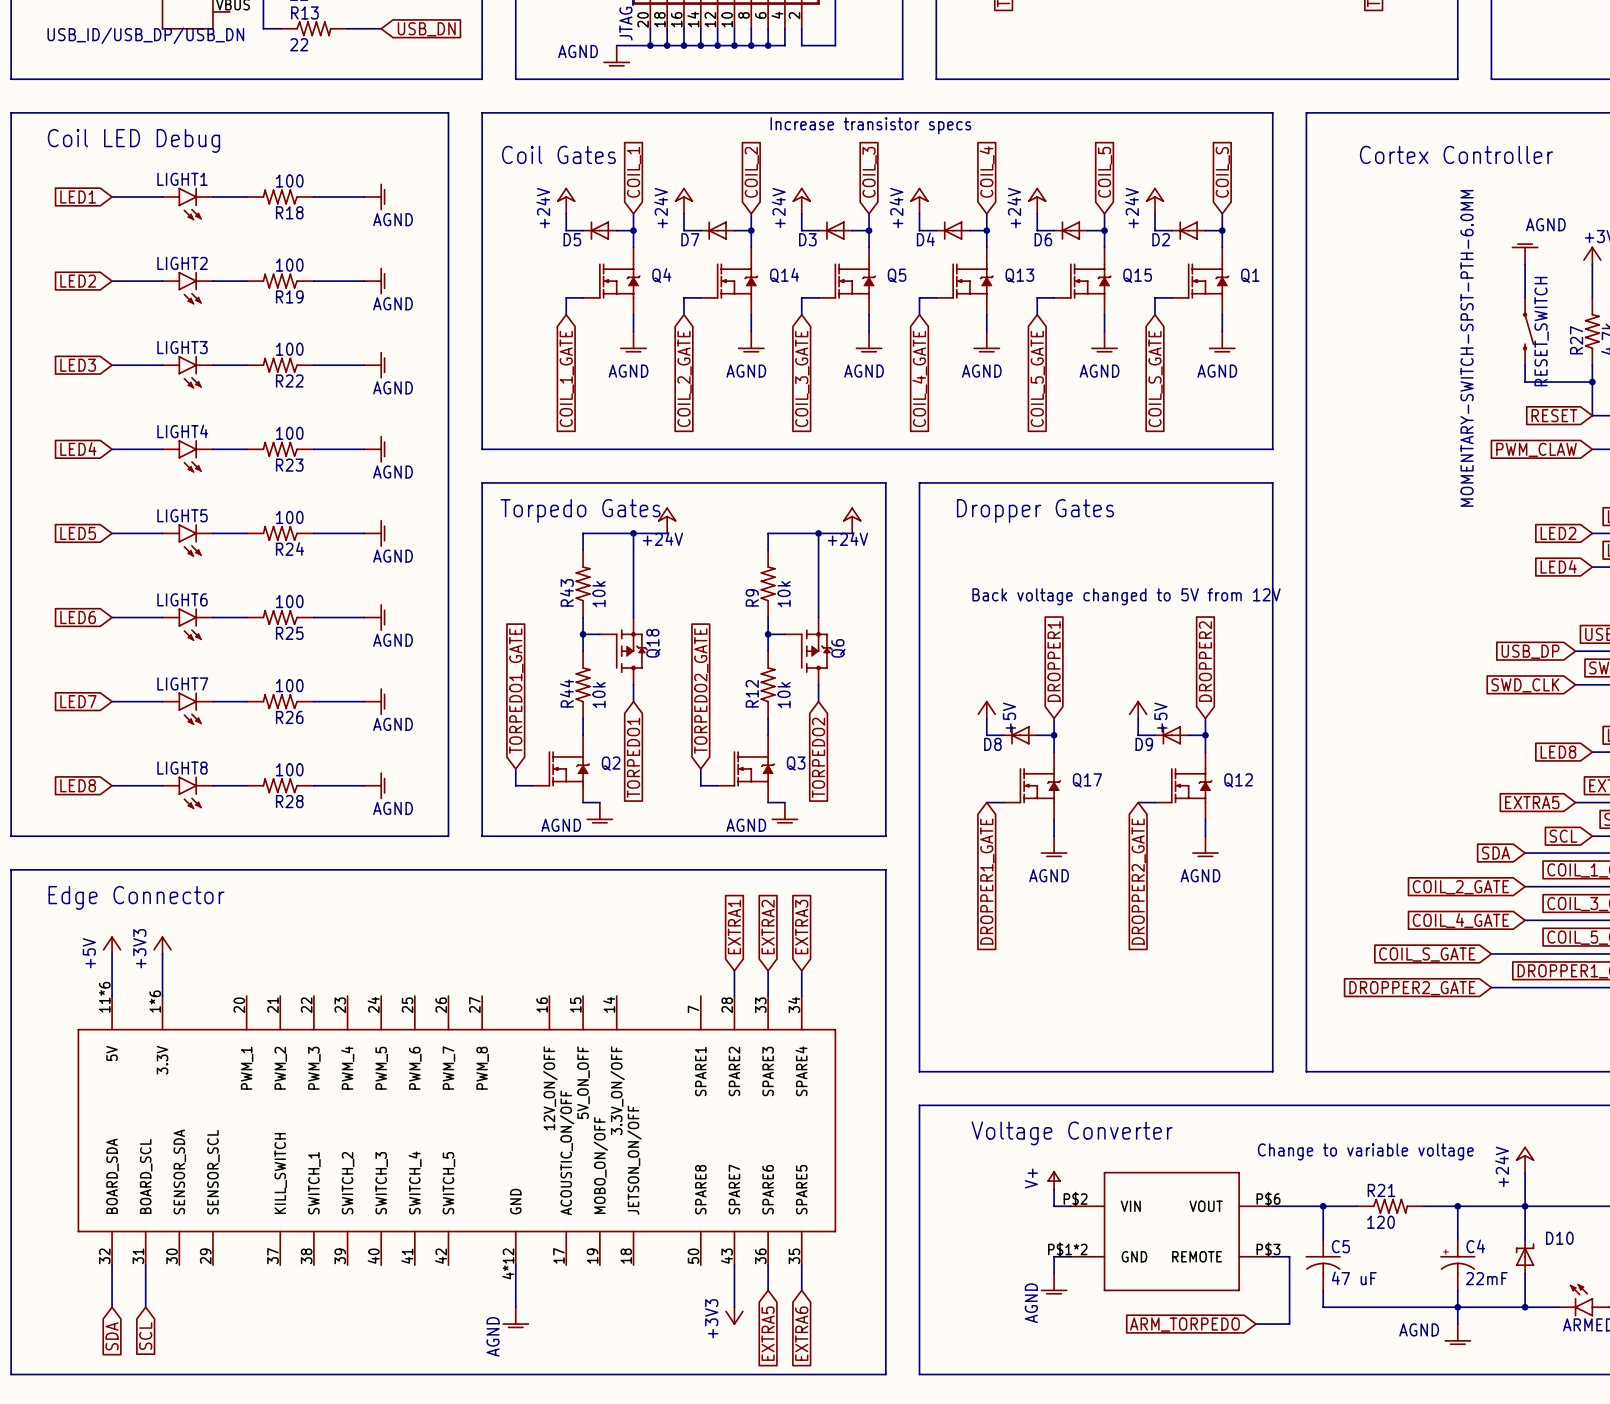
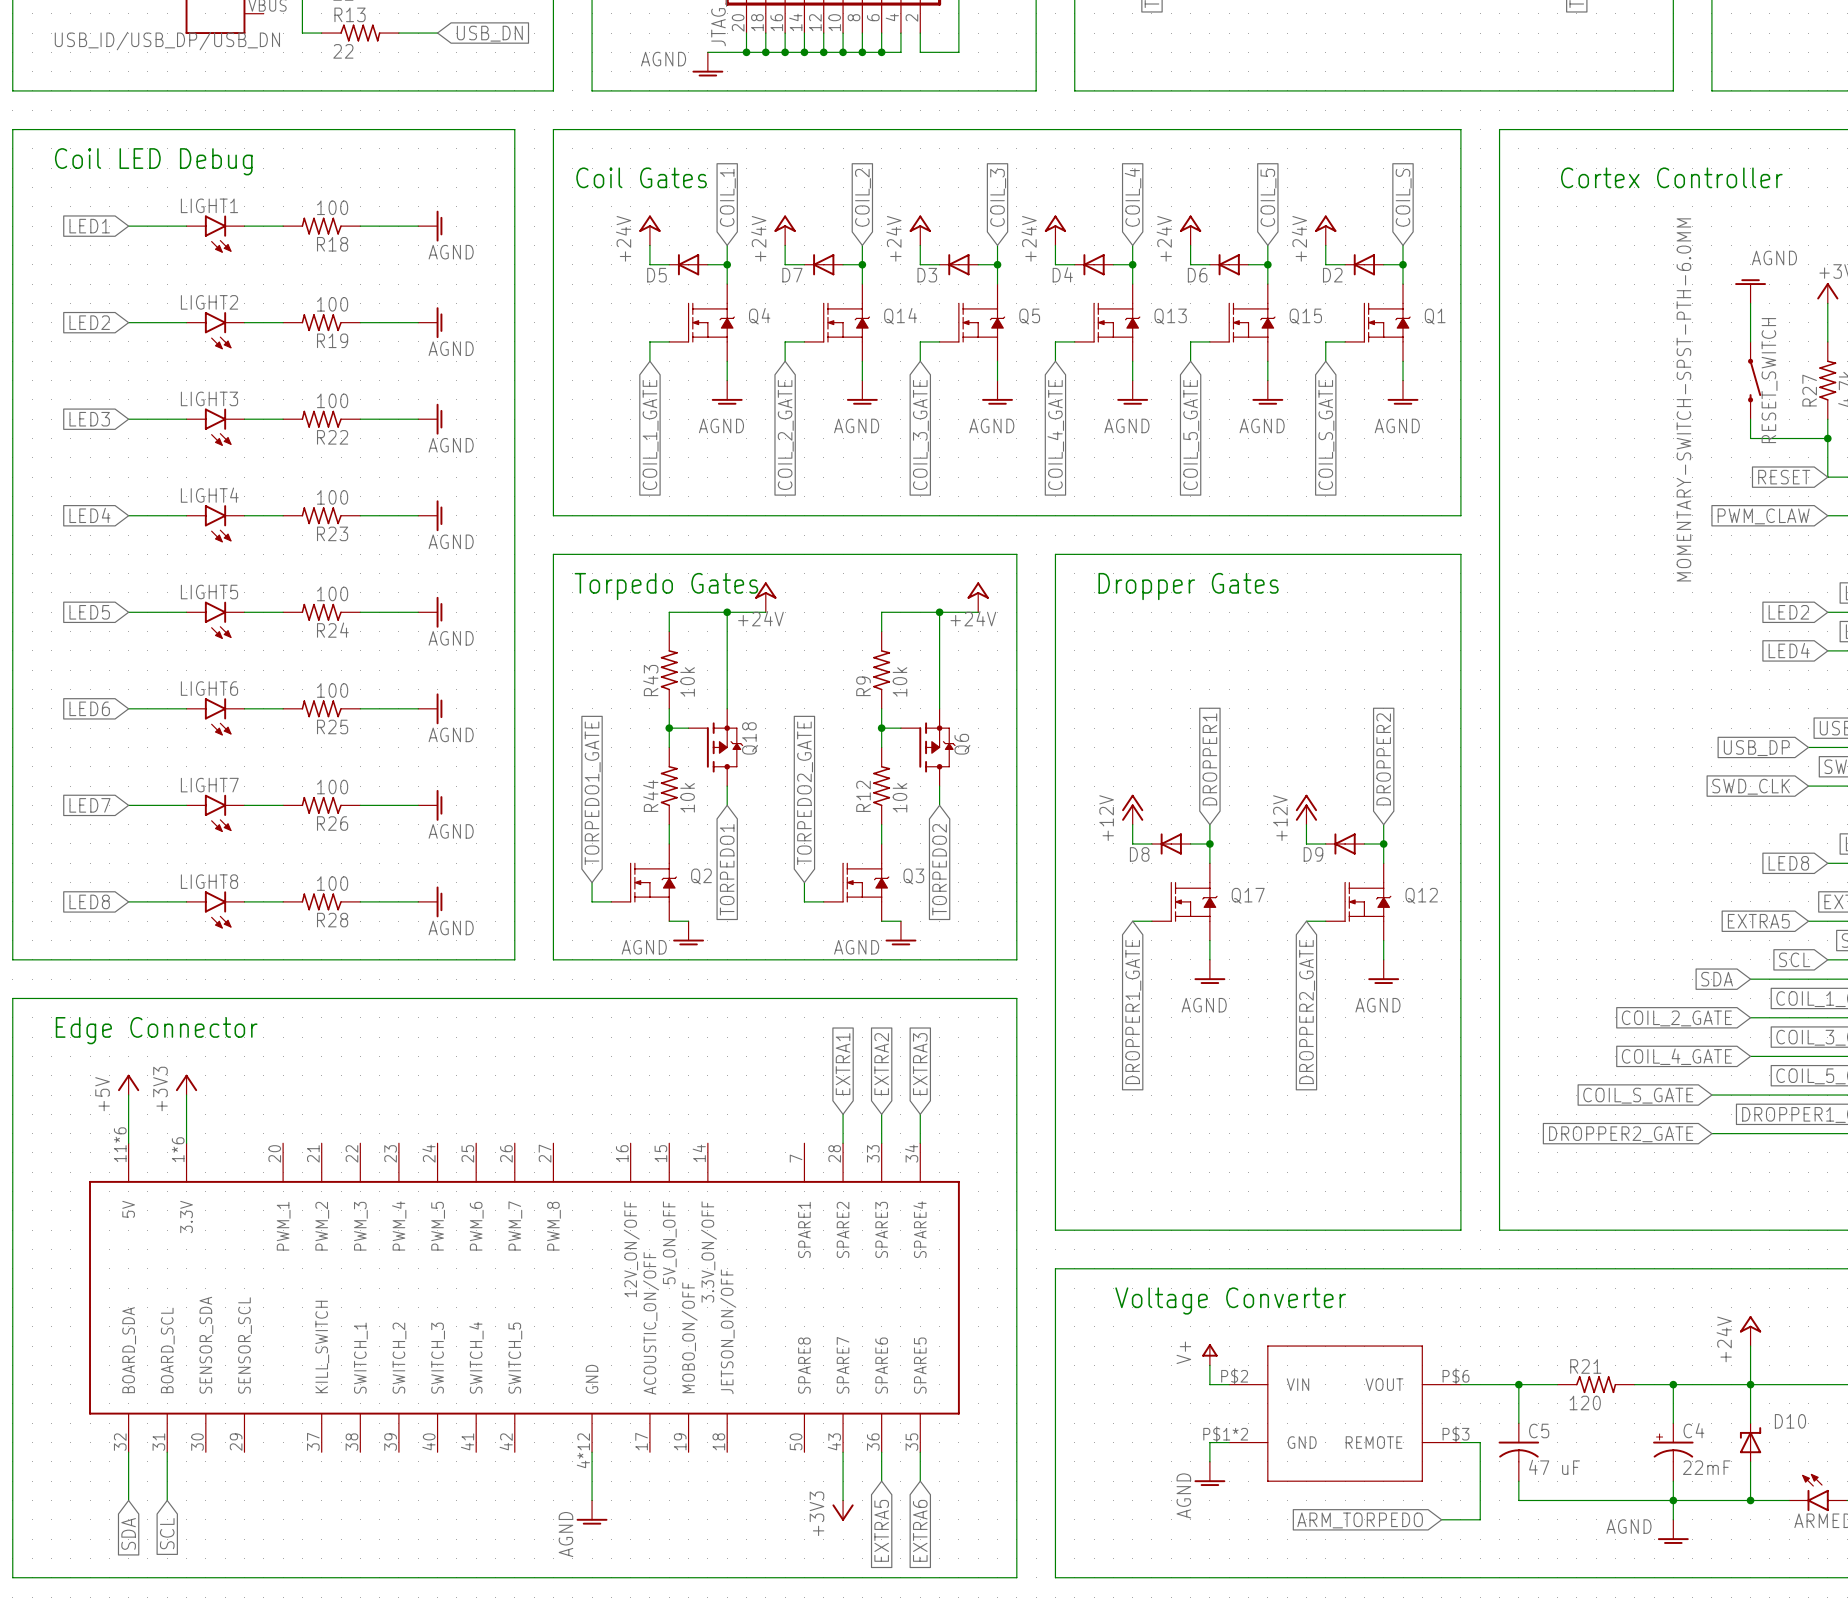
text: Increase transistor specs (870, 125) -> none
text: Back voltage changed to 5V from 12V (1126, 596) -> none
power symbol: +5V (986, 709) -> +12V (1132, 809)
power symbol: +5V (1138, 709) -> +12V (1306, 809)
text: Change to variable voltage (1365, 1151) -> none

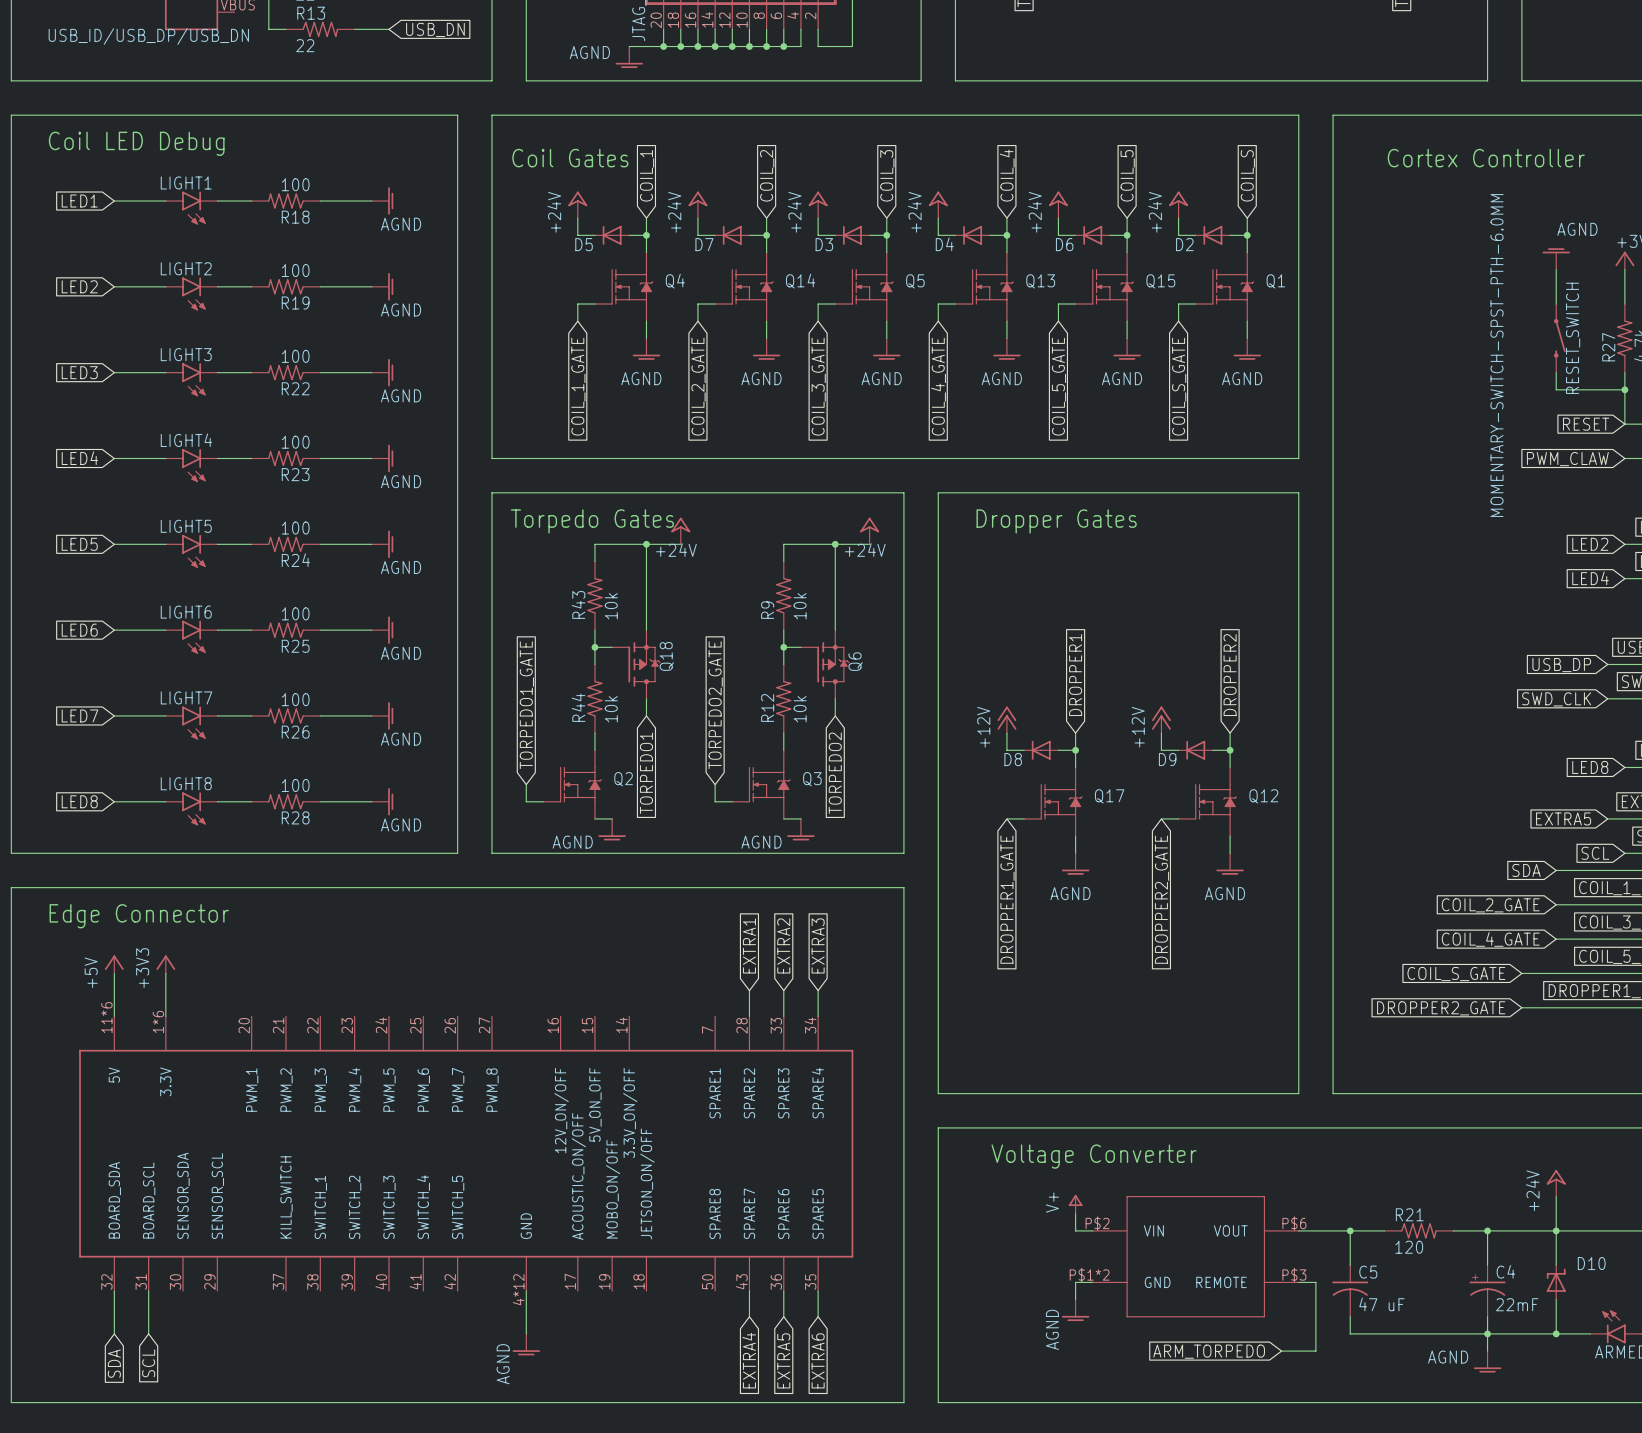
wire: (843, 1481) (843, 1500) -> none
power symbol: +3V3 (843, 1510) -> none
global label: none -> EXTRA4 (749, 1360)

